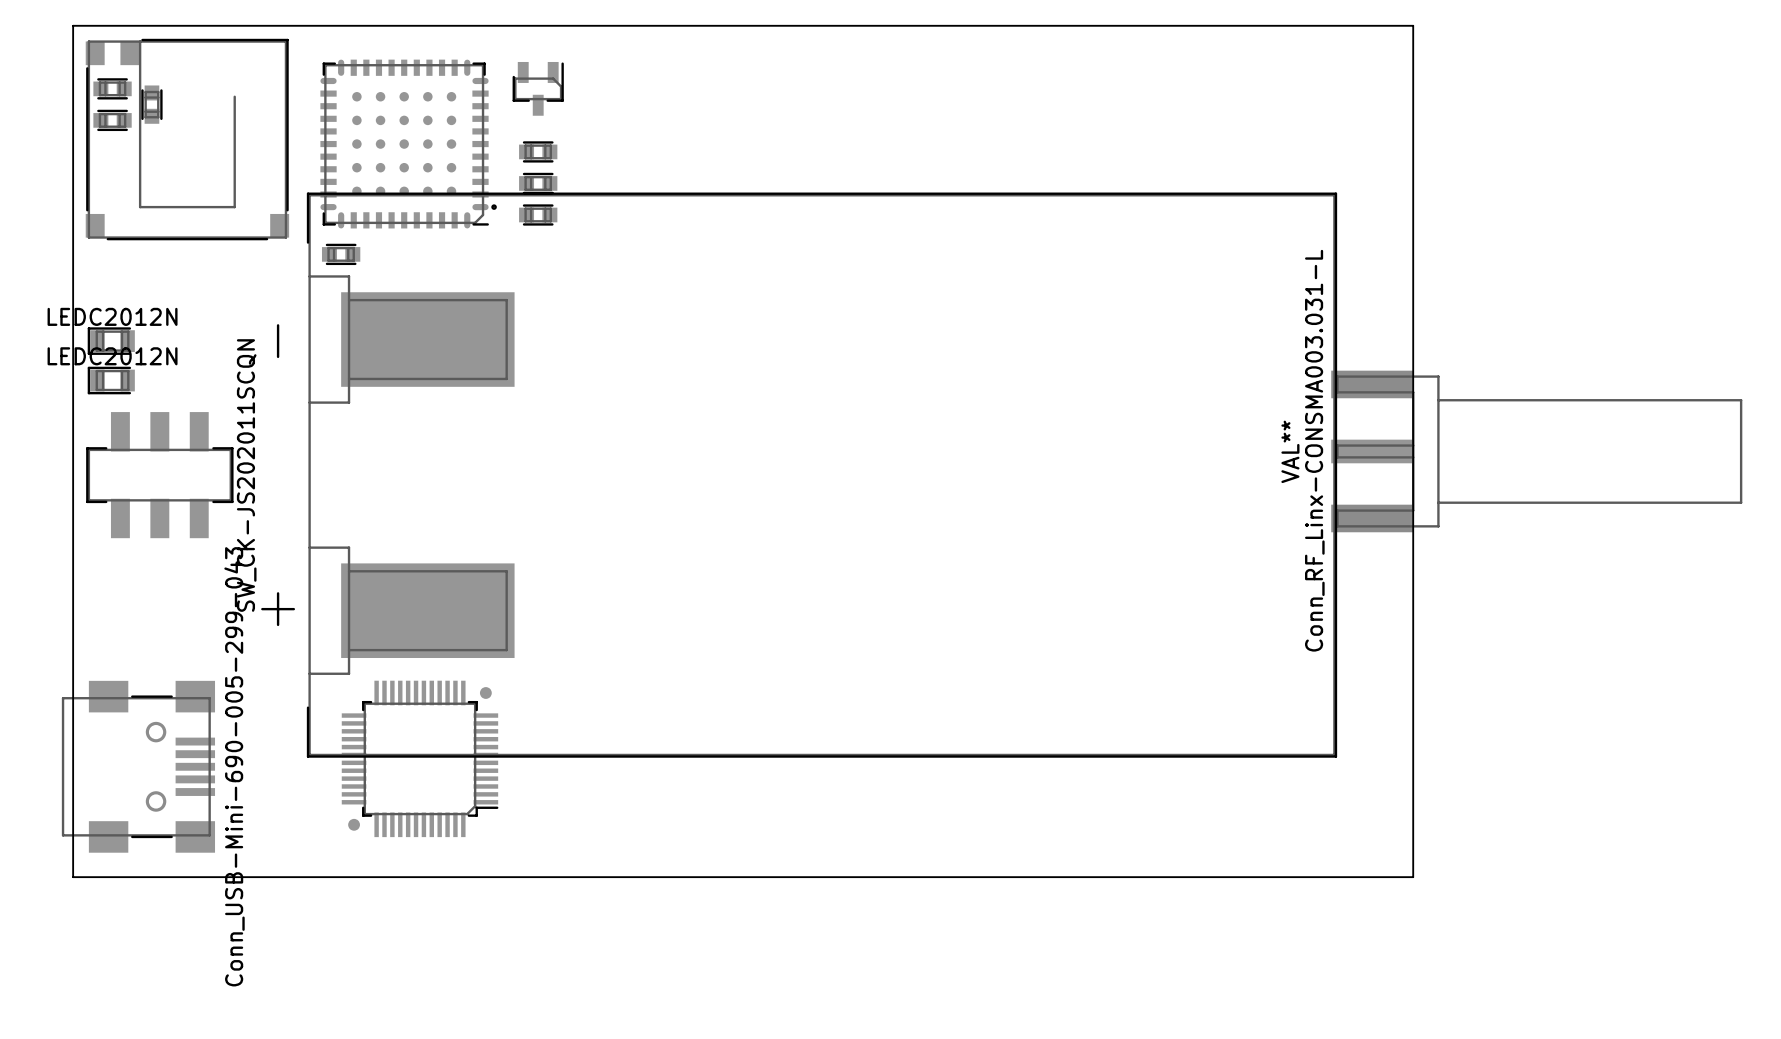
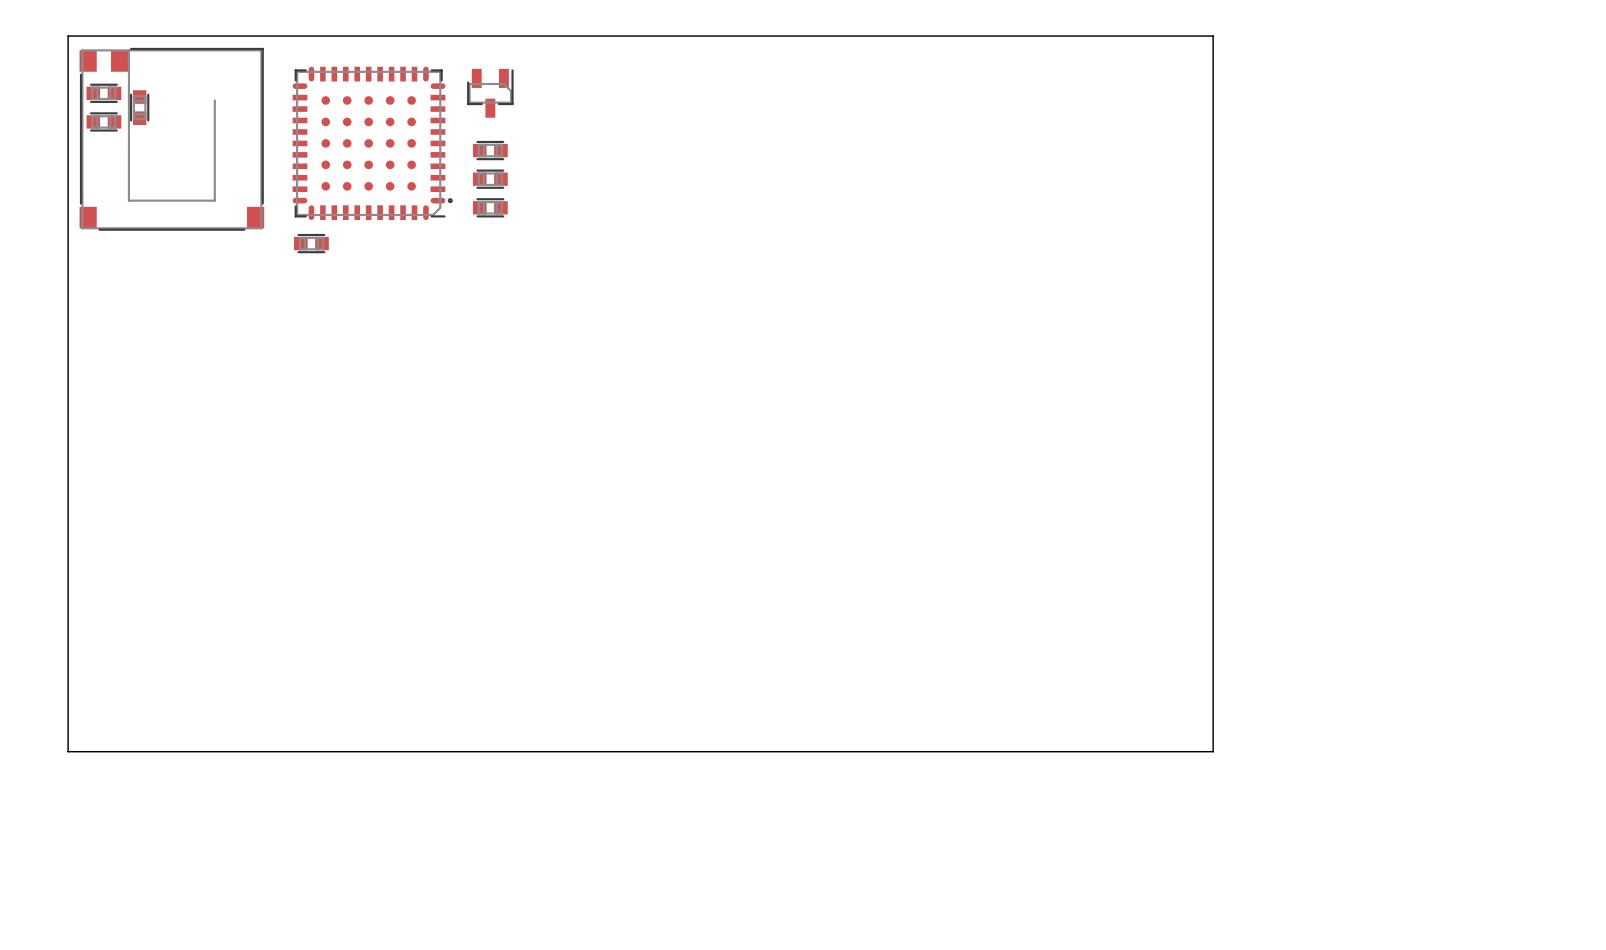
board edge: (1334, 25) (1413, 25) (1413, 877) (73, 877) (73, 814) -> (1213, 36) (1213, 751) (68, 751)
LEDC2012N: (111, 341) -> none
LEDC2012N: (111, 380) -> none
Conn_RF_Linx-CONSMA003.031-L: VAL** (1536, 451) -> none
SW_CK-JS202011SCQN: (159, 475) -> none
part: (799, 475) -> none
part: (420, 758) -> none
Conn_USB-Mini-690-005-299-043: (138, 766) -> none

